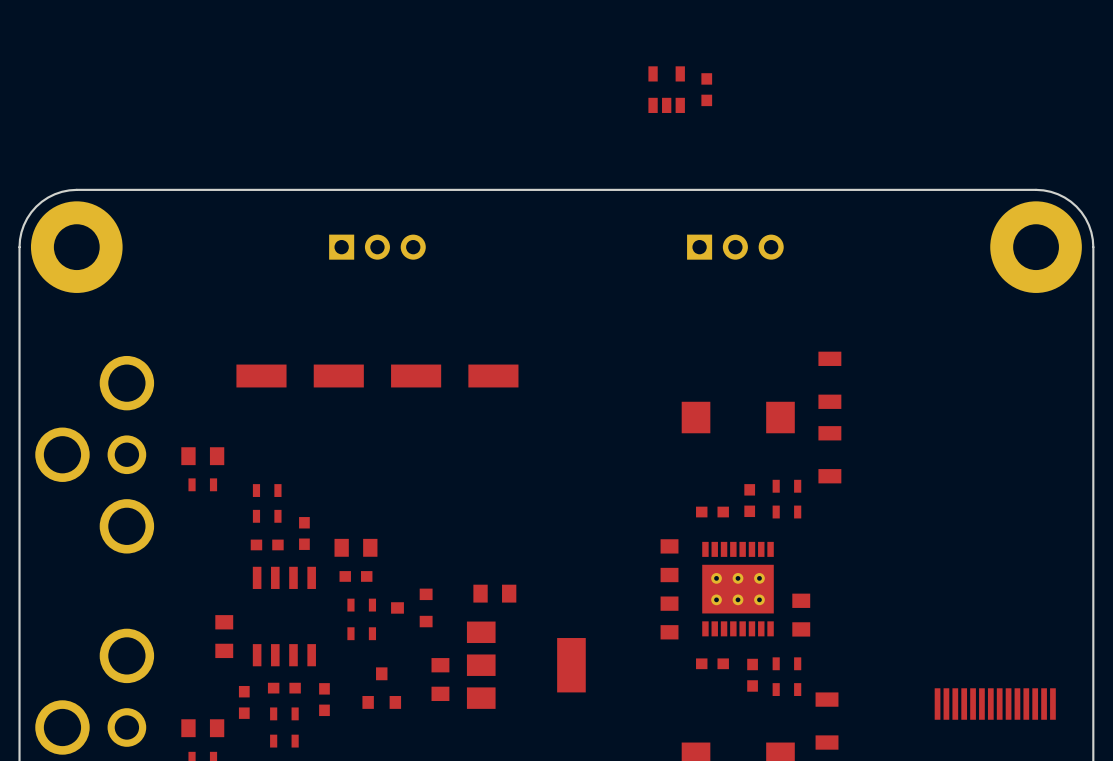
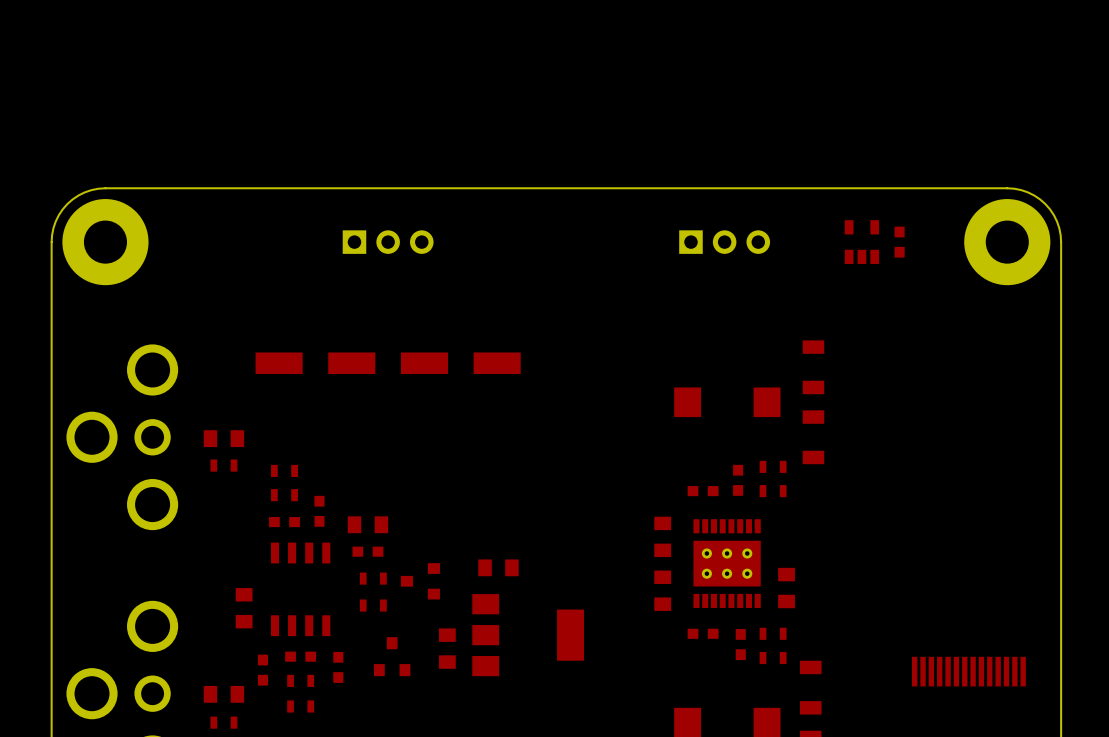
part position: (666, 89) -> (861, 242)
part position: (706, 89) -> (899, 242)

